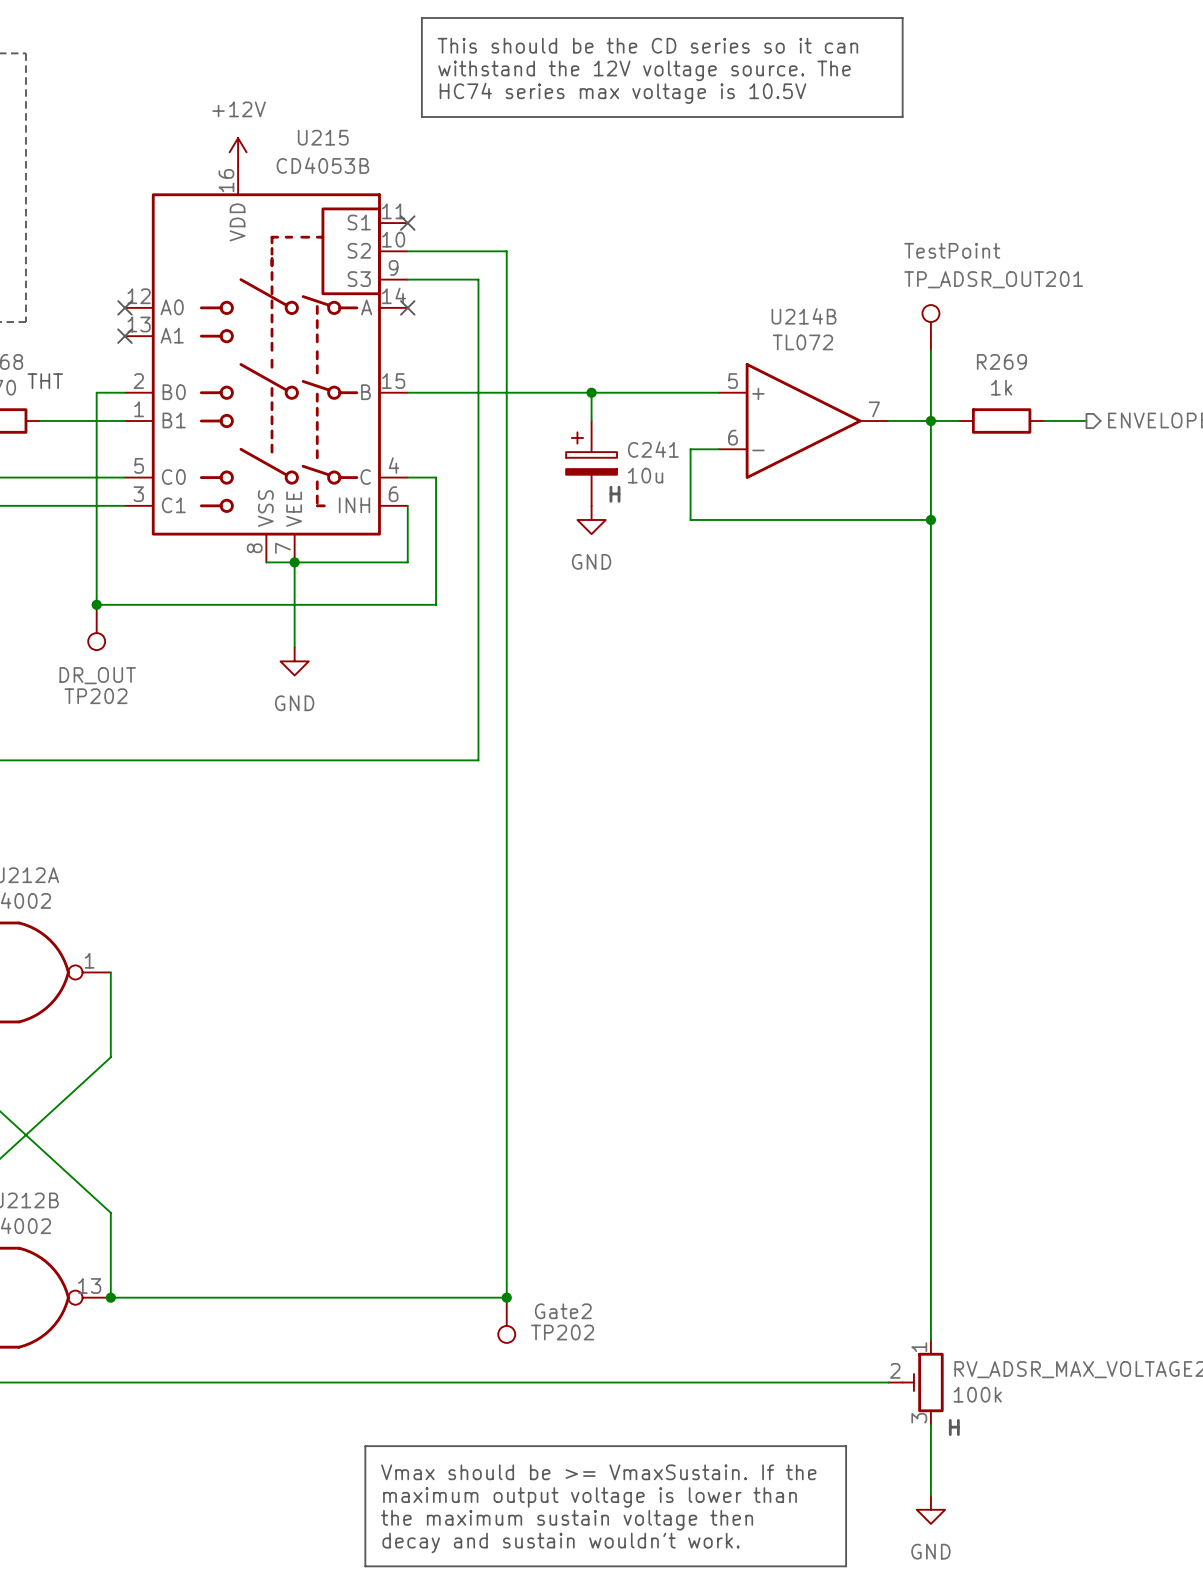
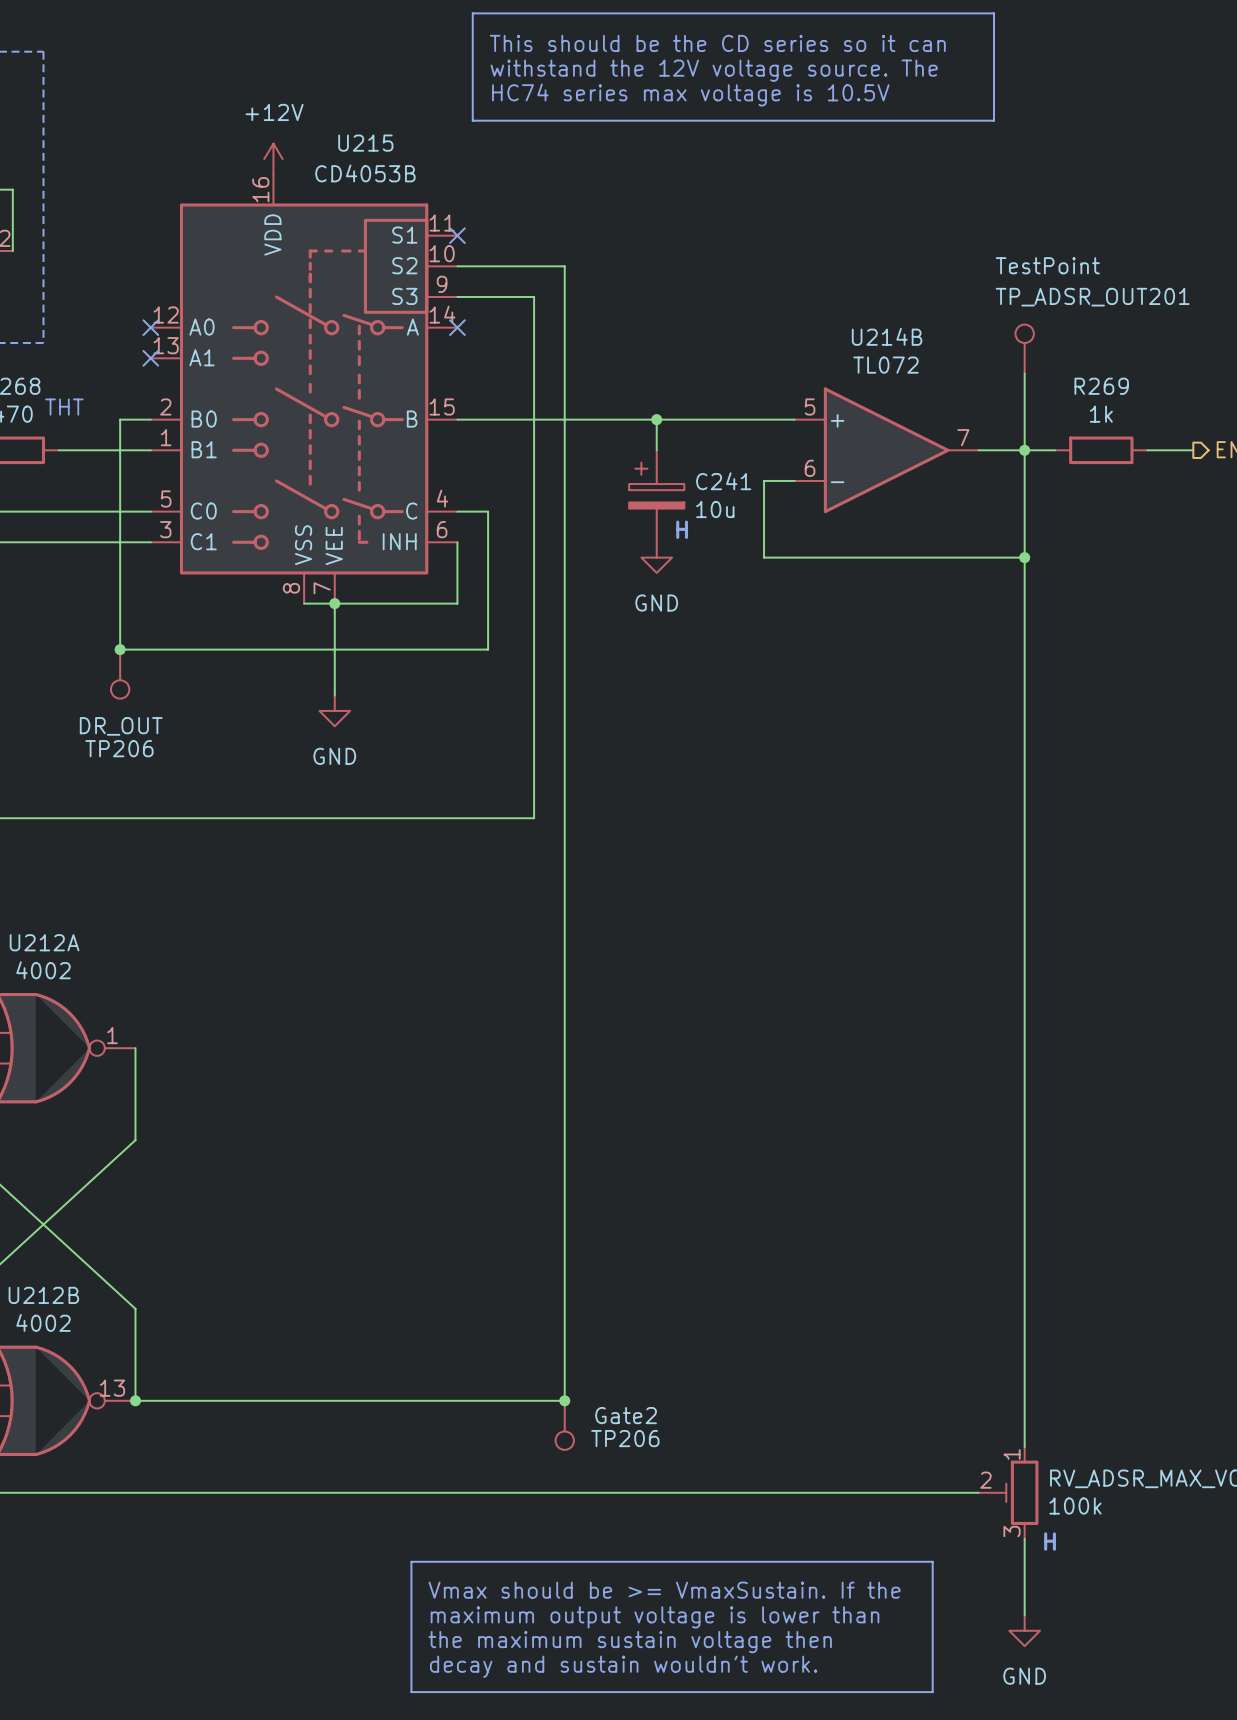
TP202 name: TP202 (96, 696) -> TP206 (119, 748)
TP202 name: TP202 (562, 1332) -> TP206 (625, 1438)

